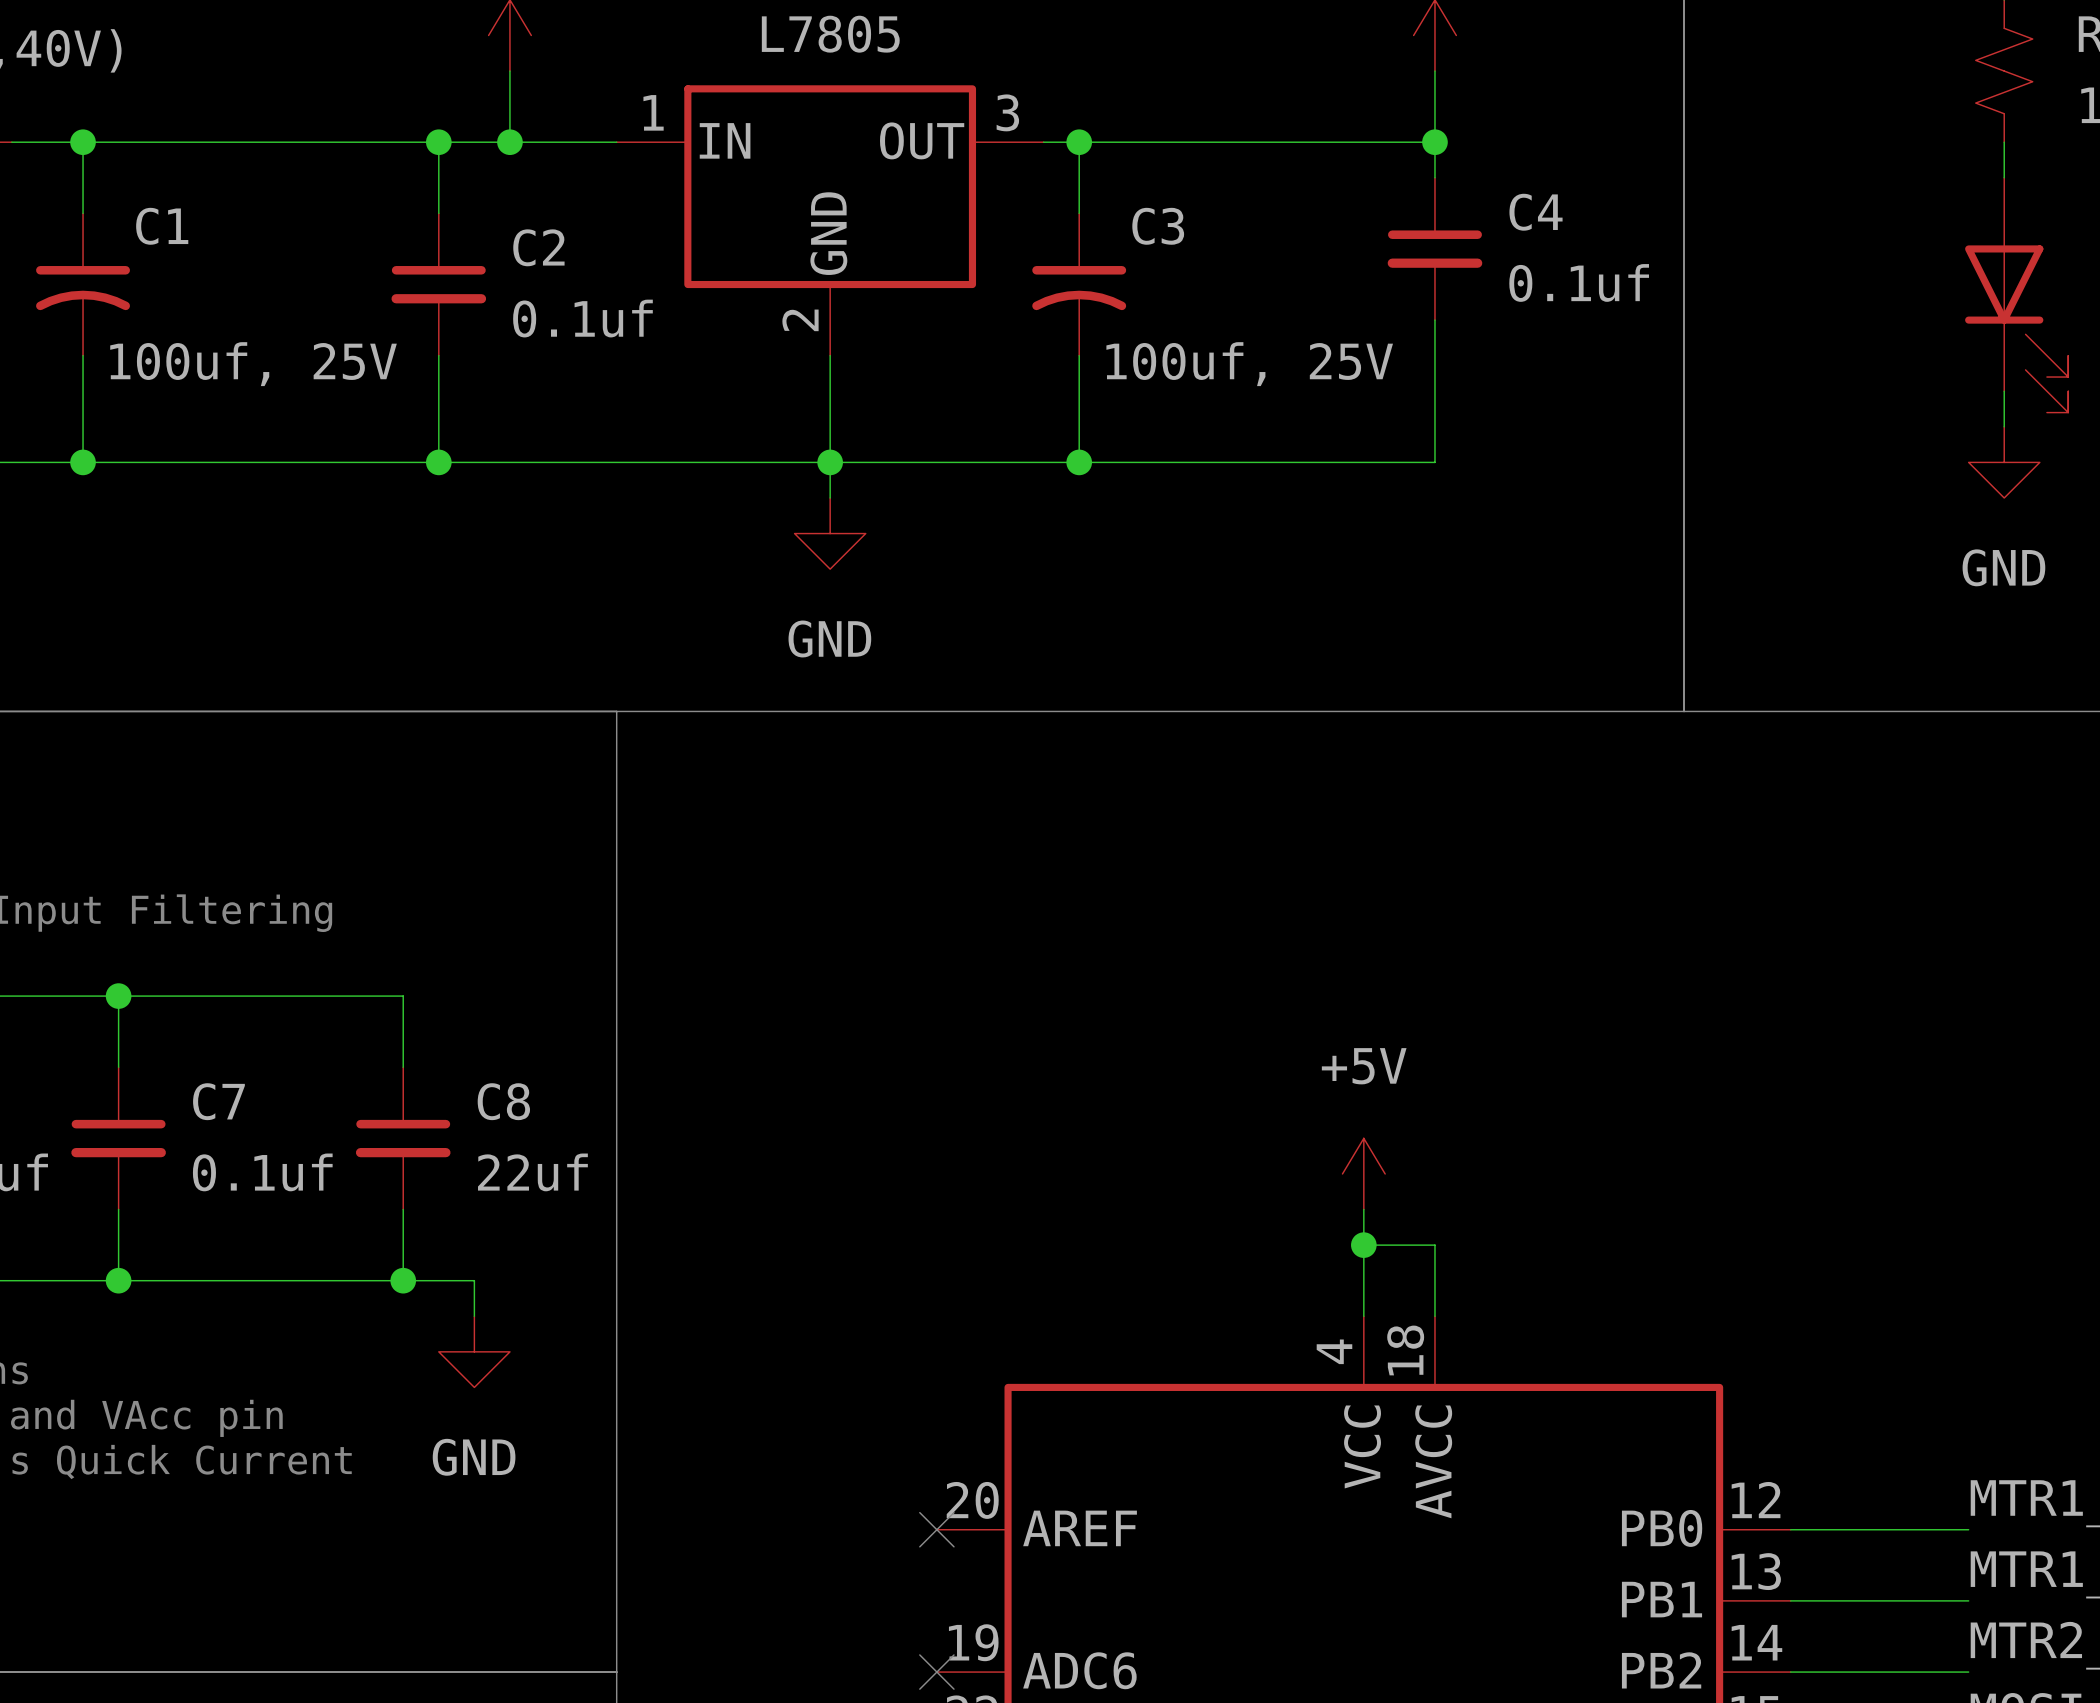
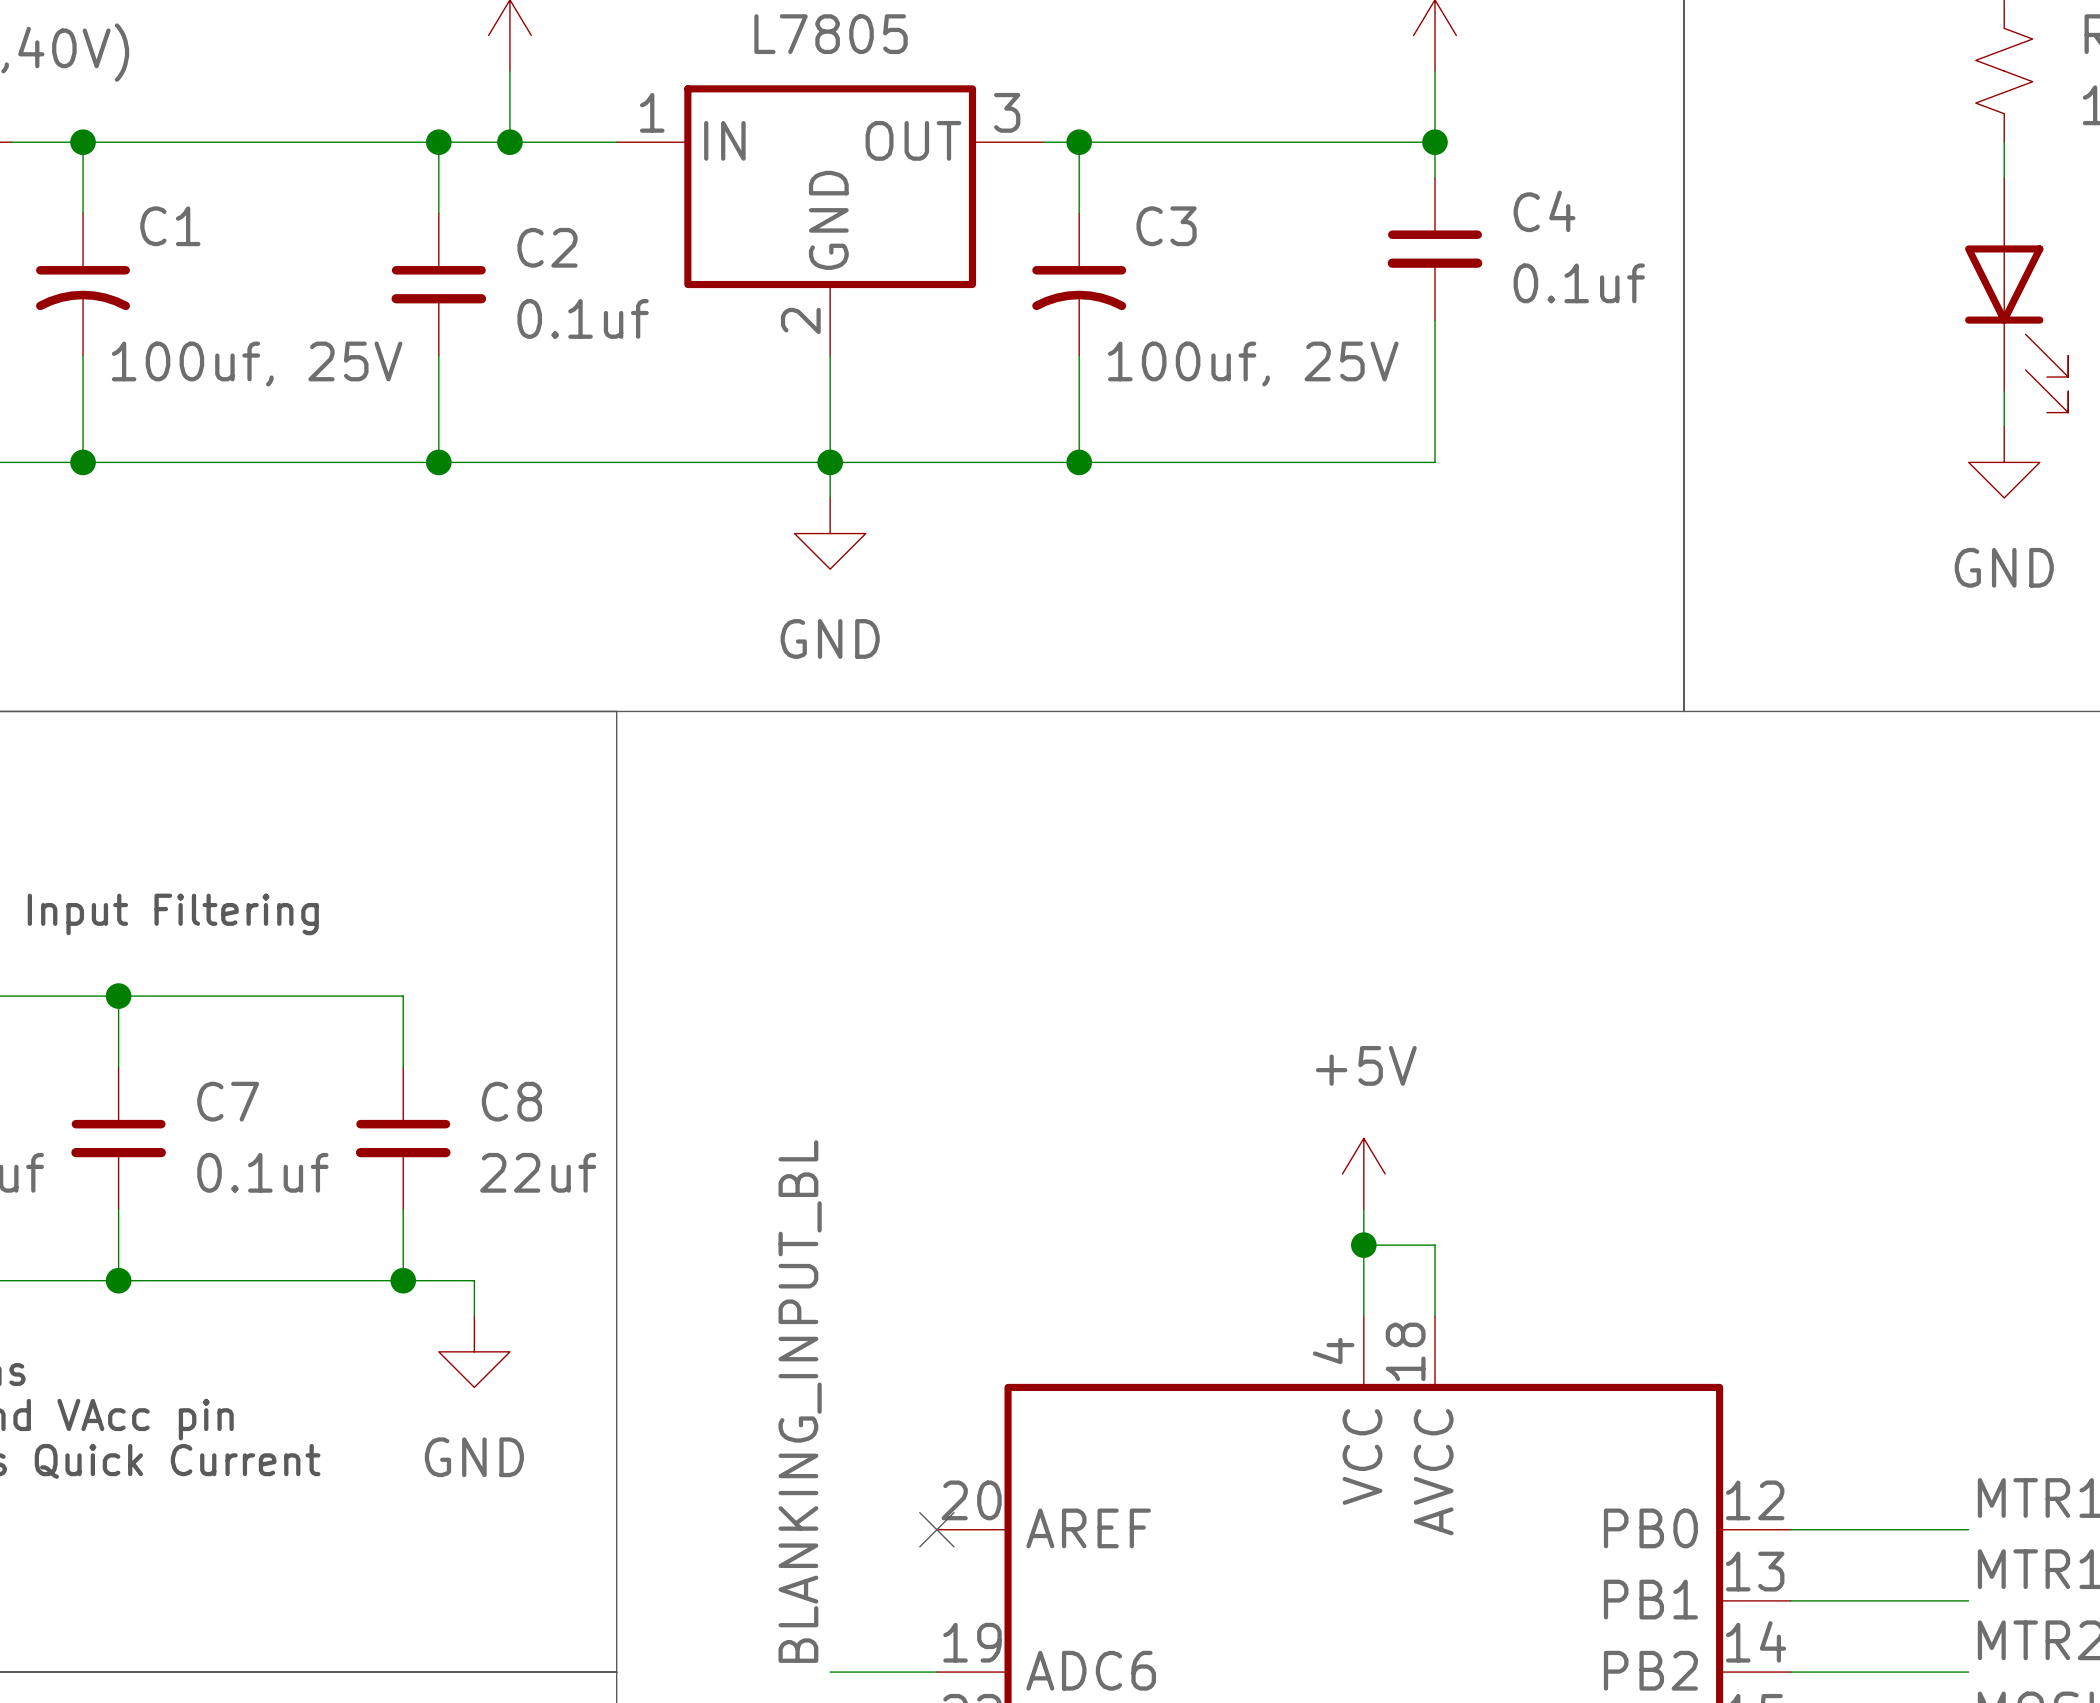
label: none -> BLANKING_INPUT_BL (800, 1401)
wire: none -> (830, 1672) (936, 1672)
no-connect mark: (936, 1672) -> none

